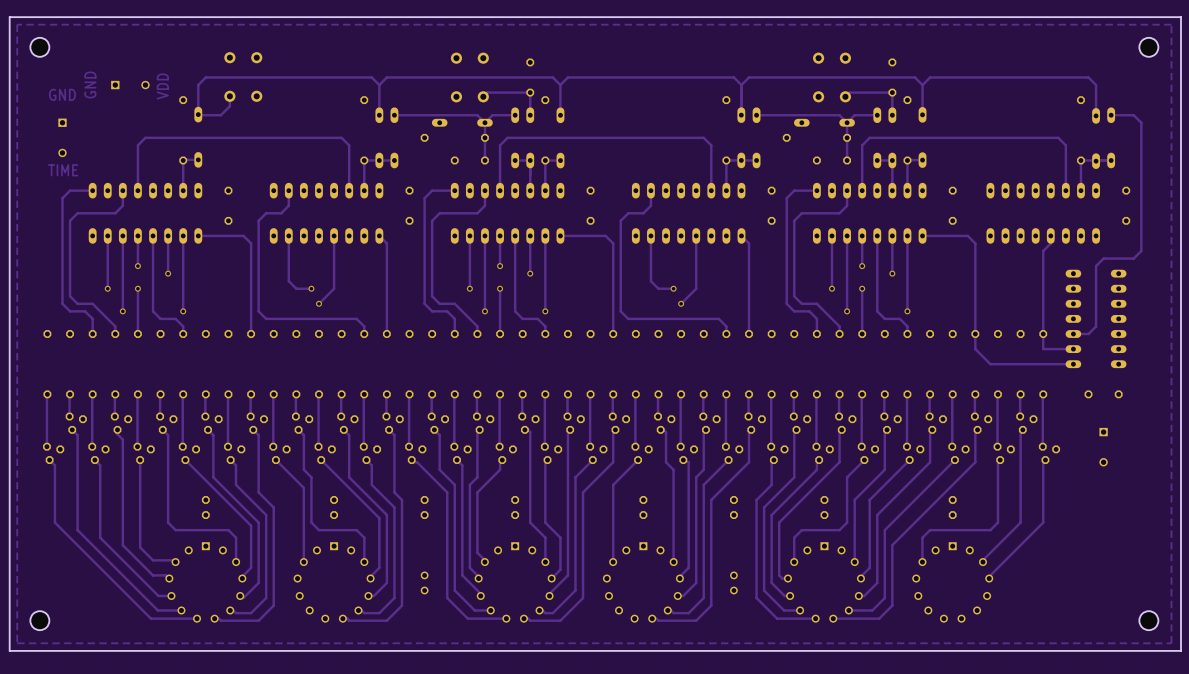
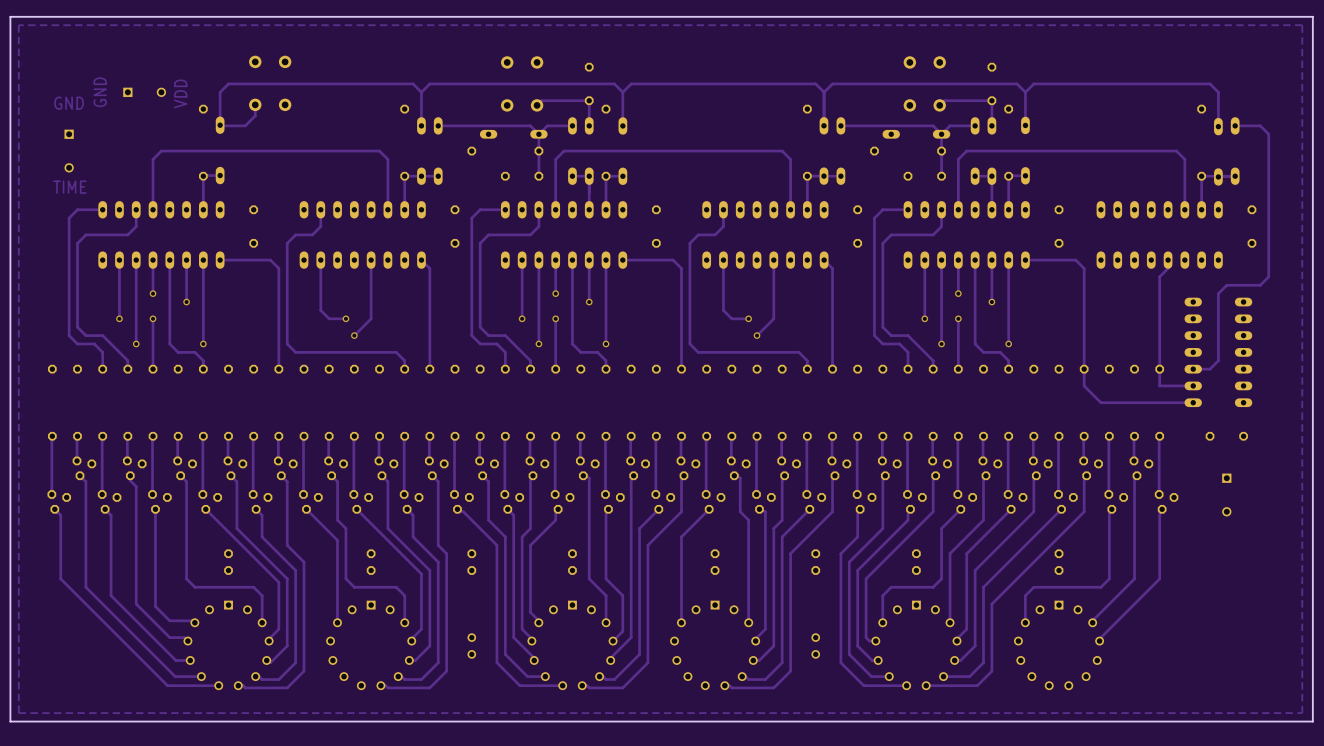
hole: (39, 47) -> none
hole: (1148, 47) -> none
hole: (39, 620) -> none
hole: (1148, 620) -> none

